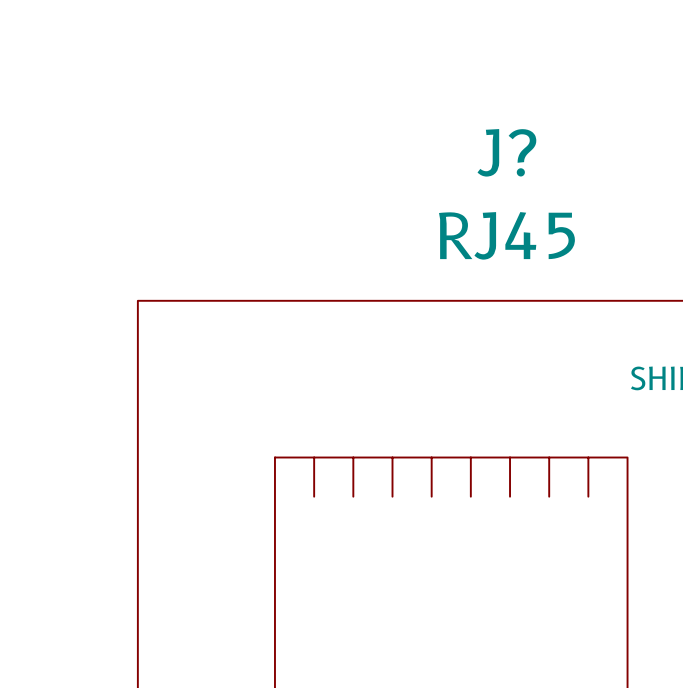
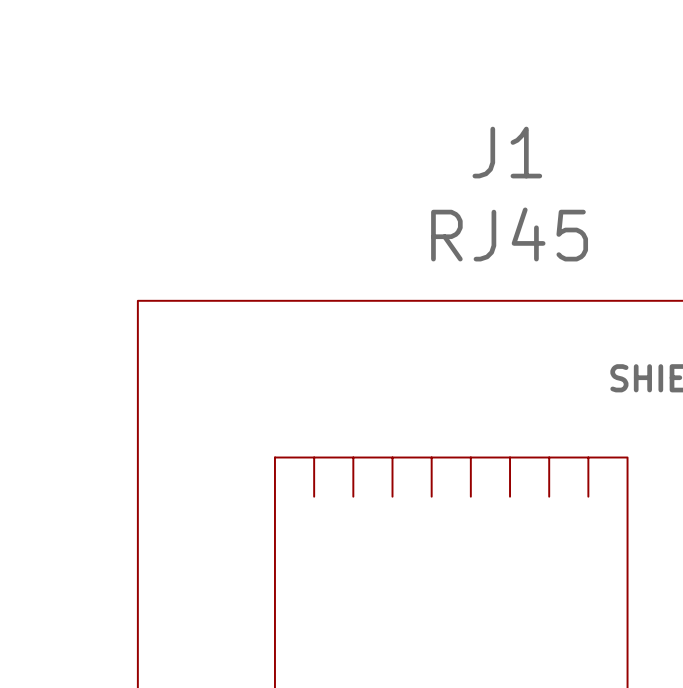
J? name: J? (506, 152) -> J1 (507, 152)

